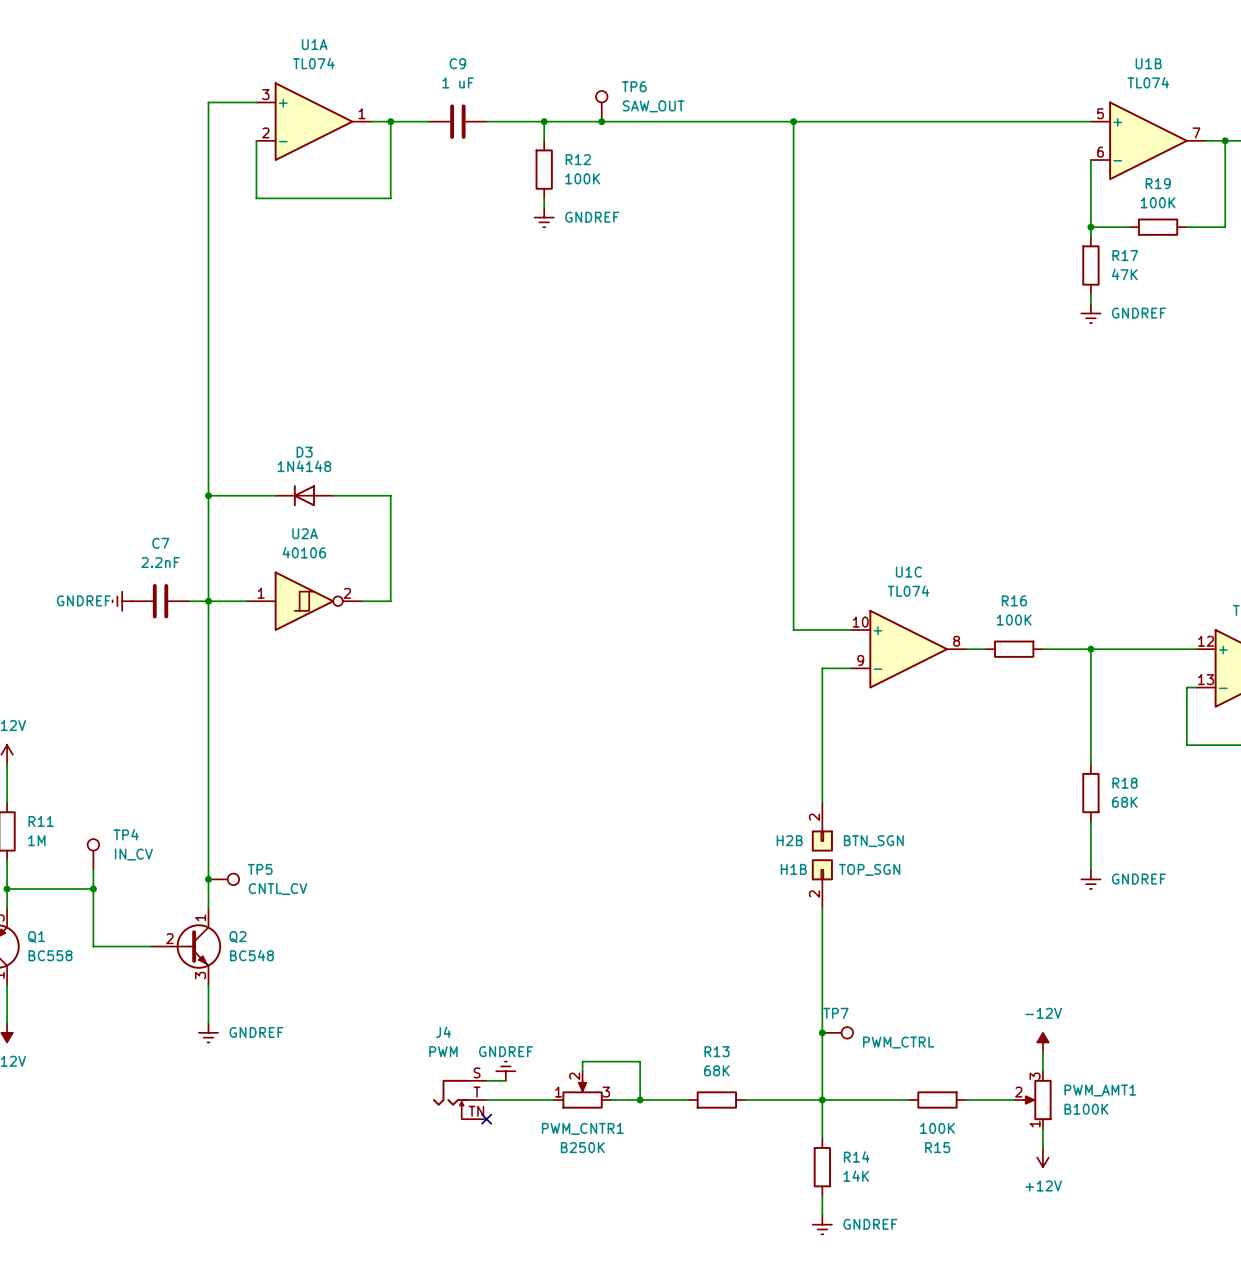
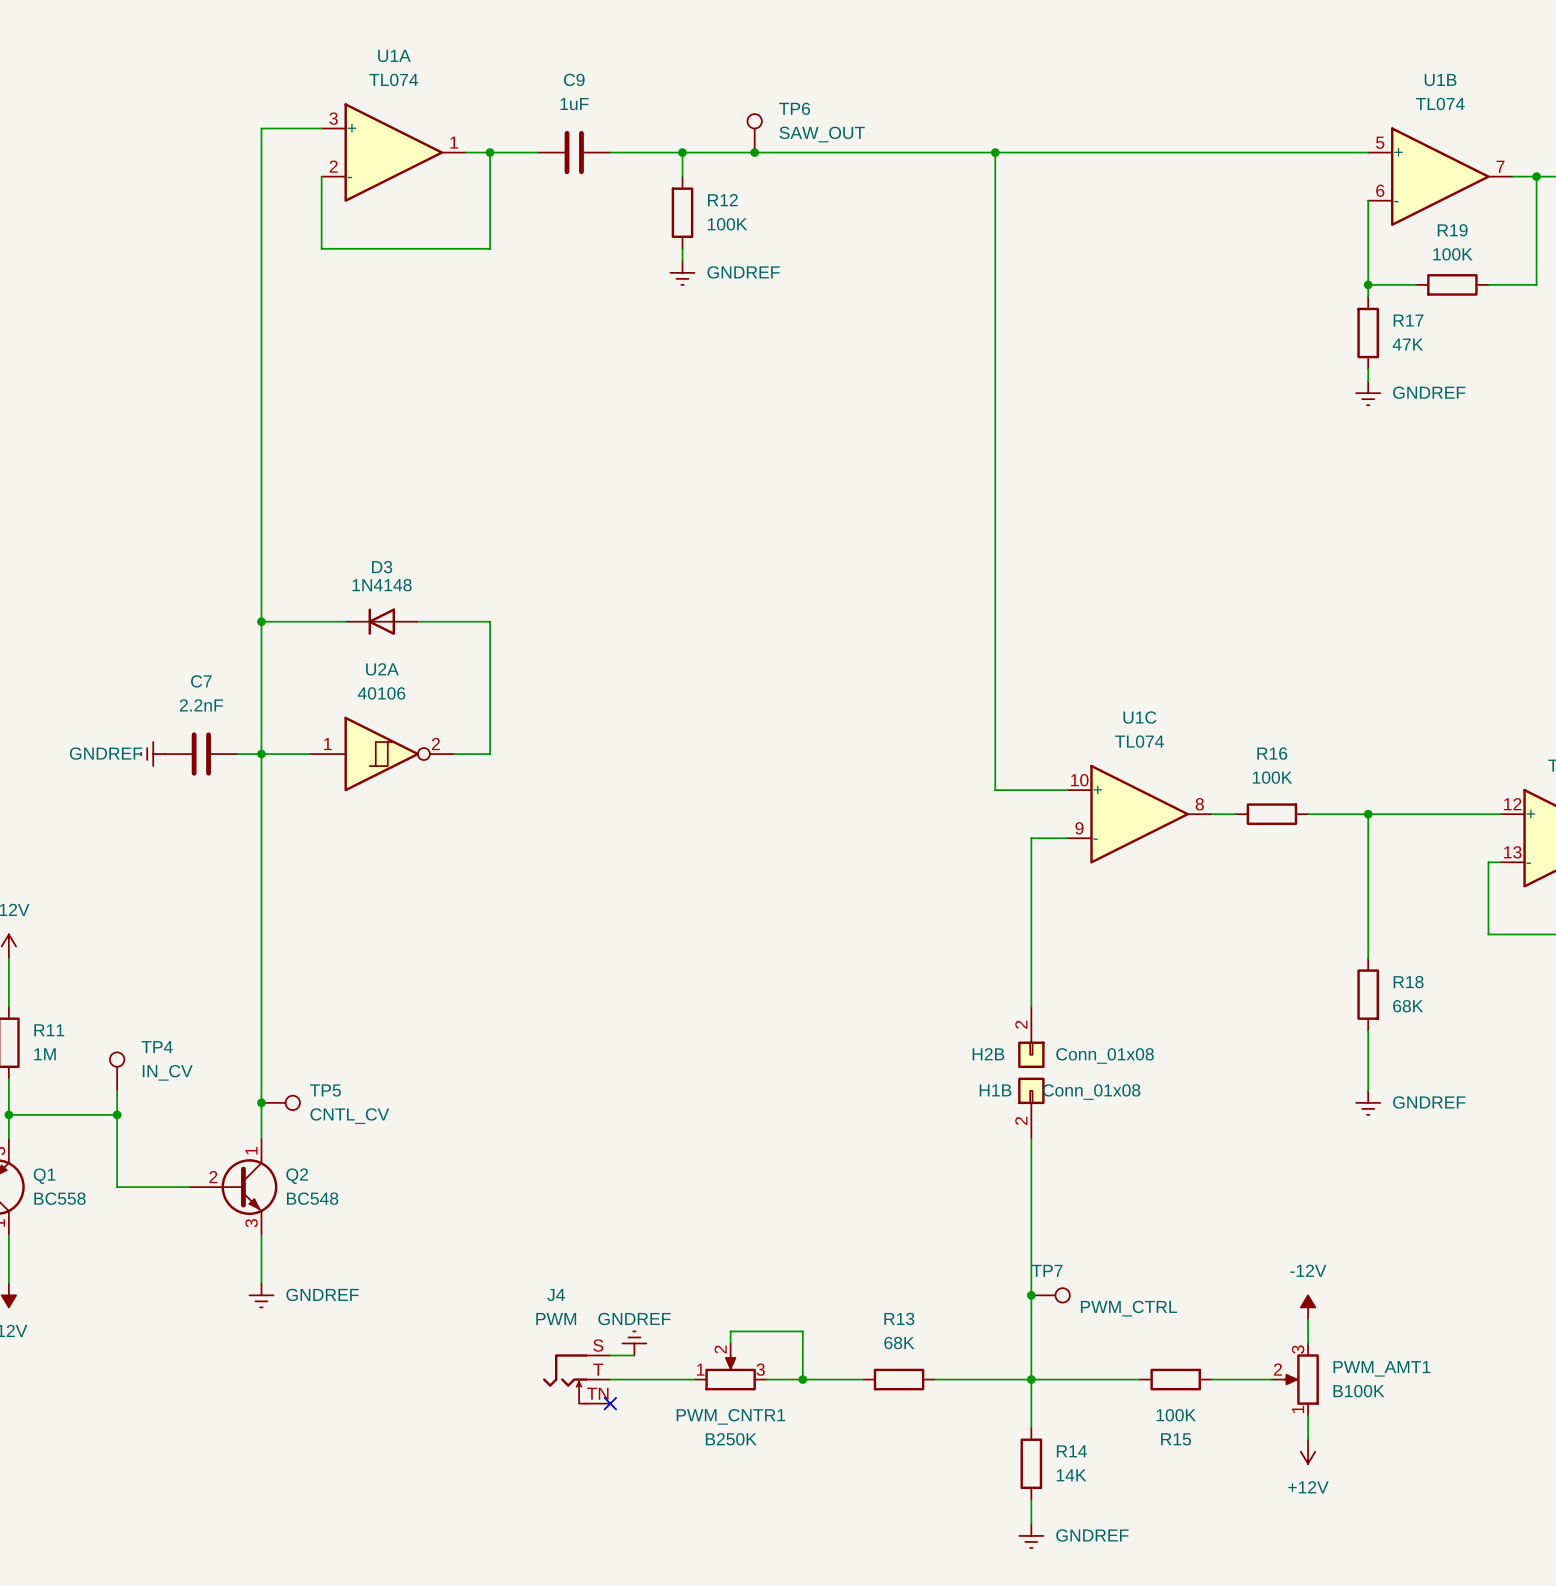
C9 value: 1 uF (458, 82) -> 1uF (574, 104)
H2B value: BTN_SGN (873, 841) -> Conn_01x08 (1105, 1055)
H1B value: TOP_SGN (869, 869) -> Conn_01x08 (1091, 1092)

